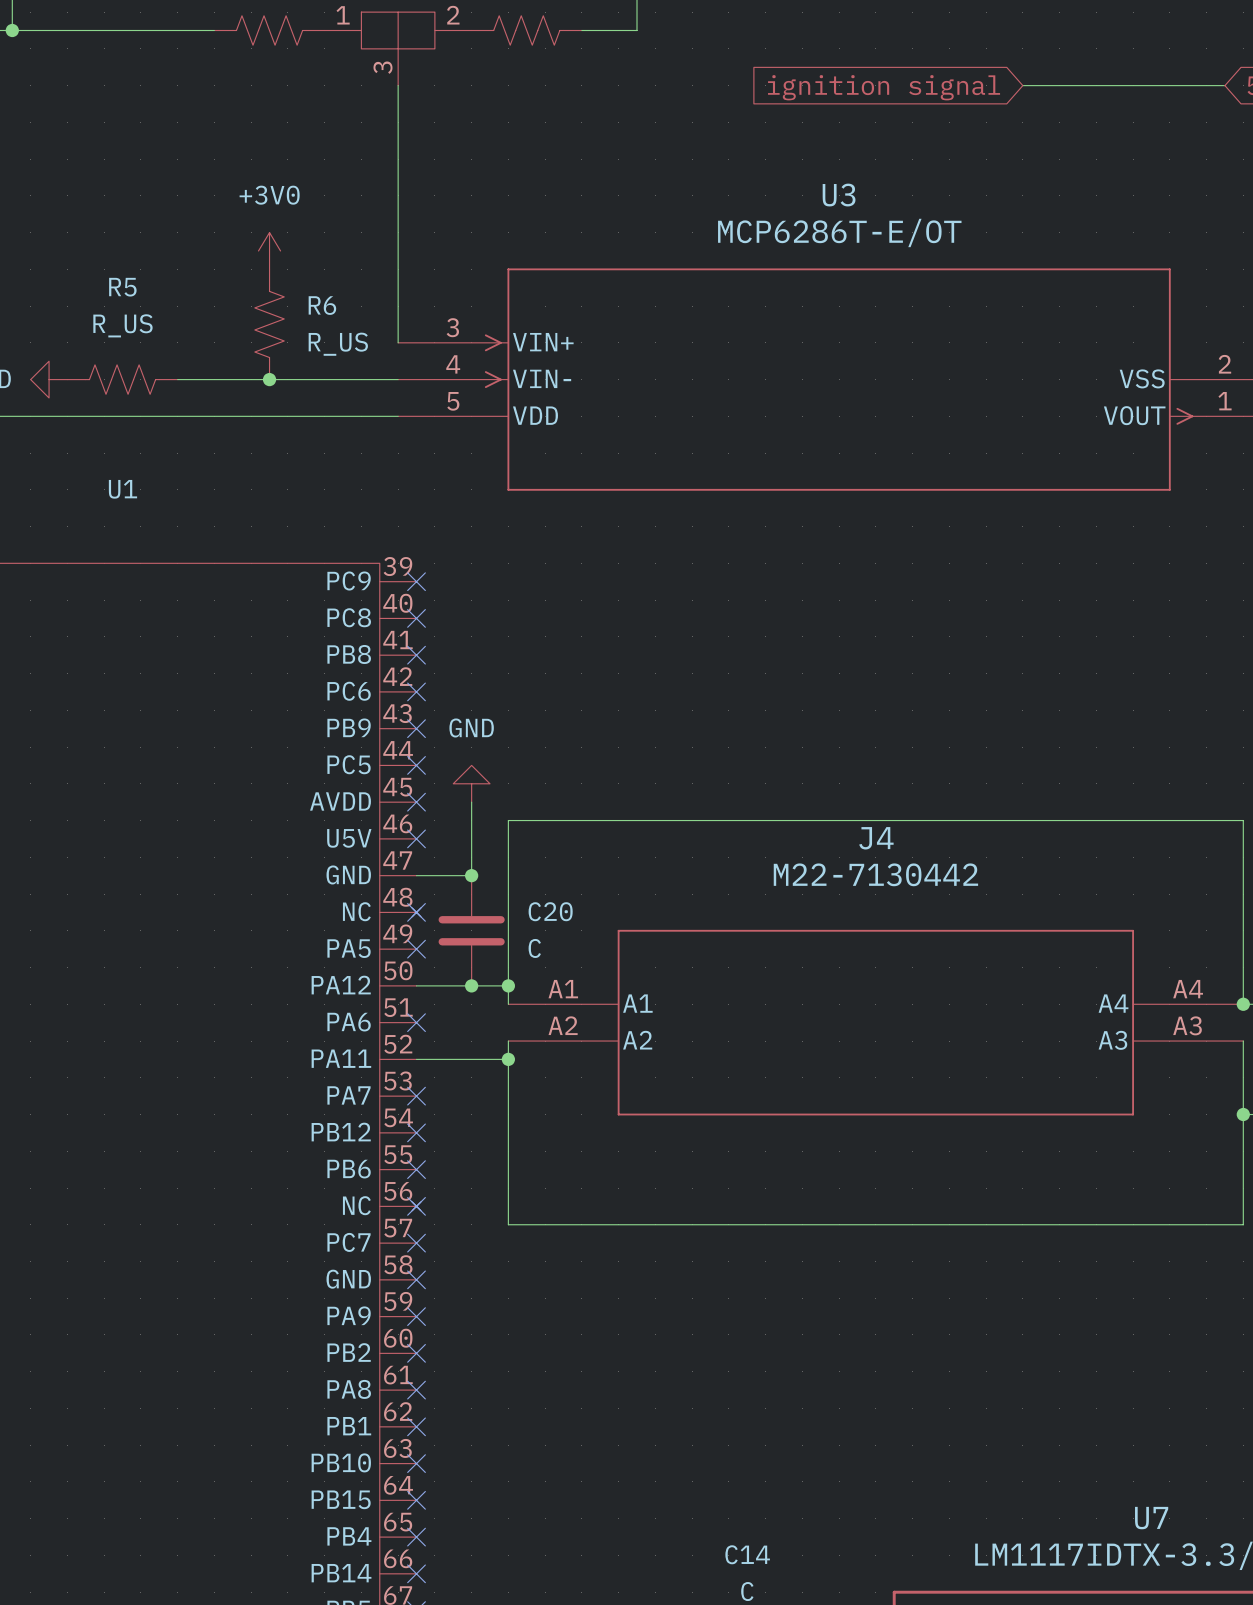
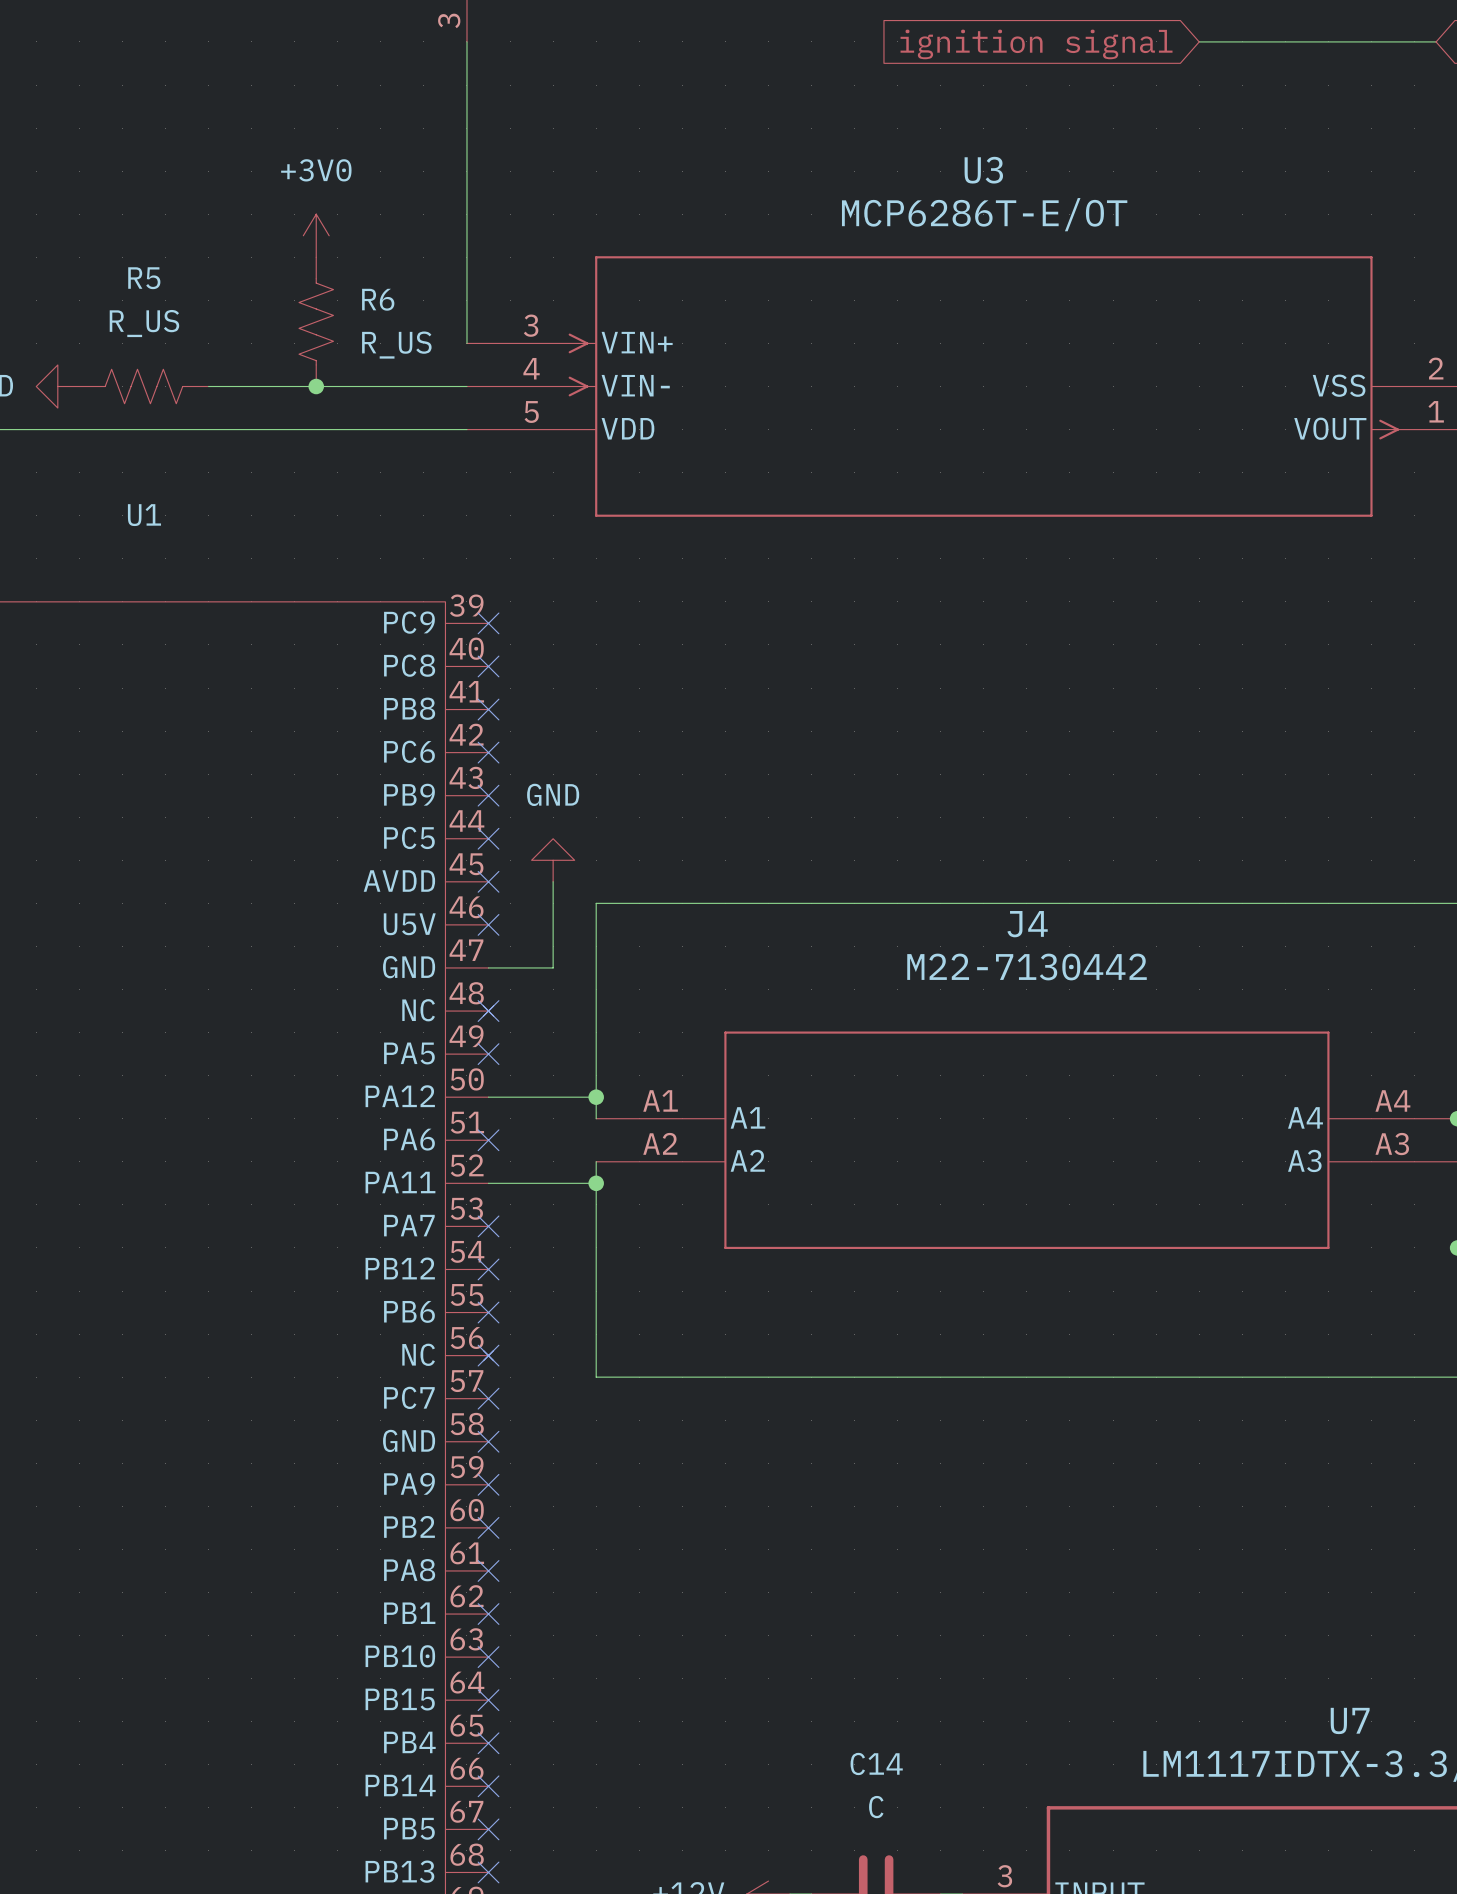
junction: (471, 875) -> none
C20: C (471, 930) -> none
junction: (471, 985) -> none

